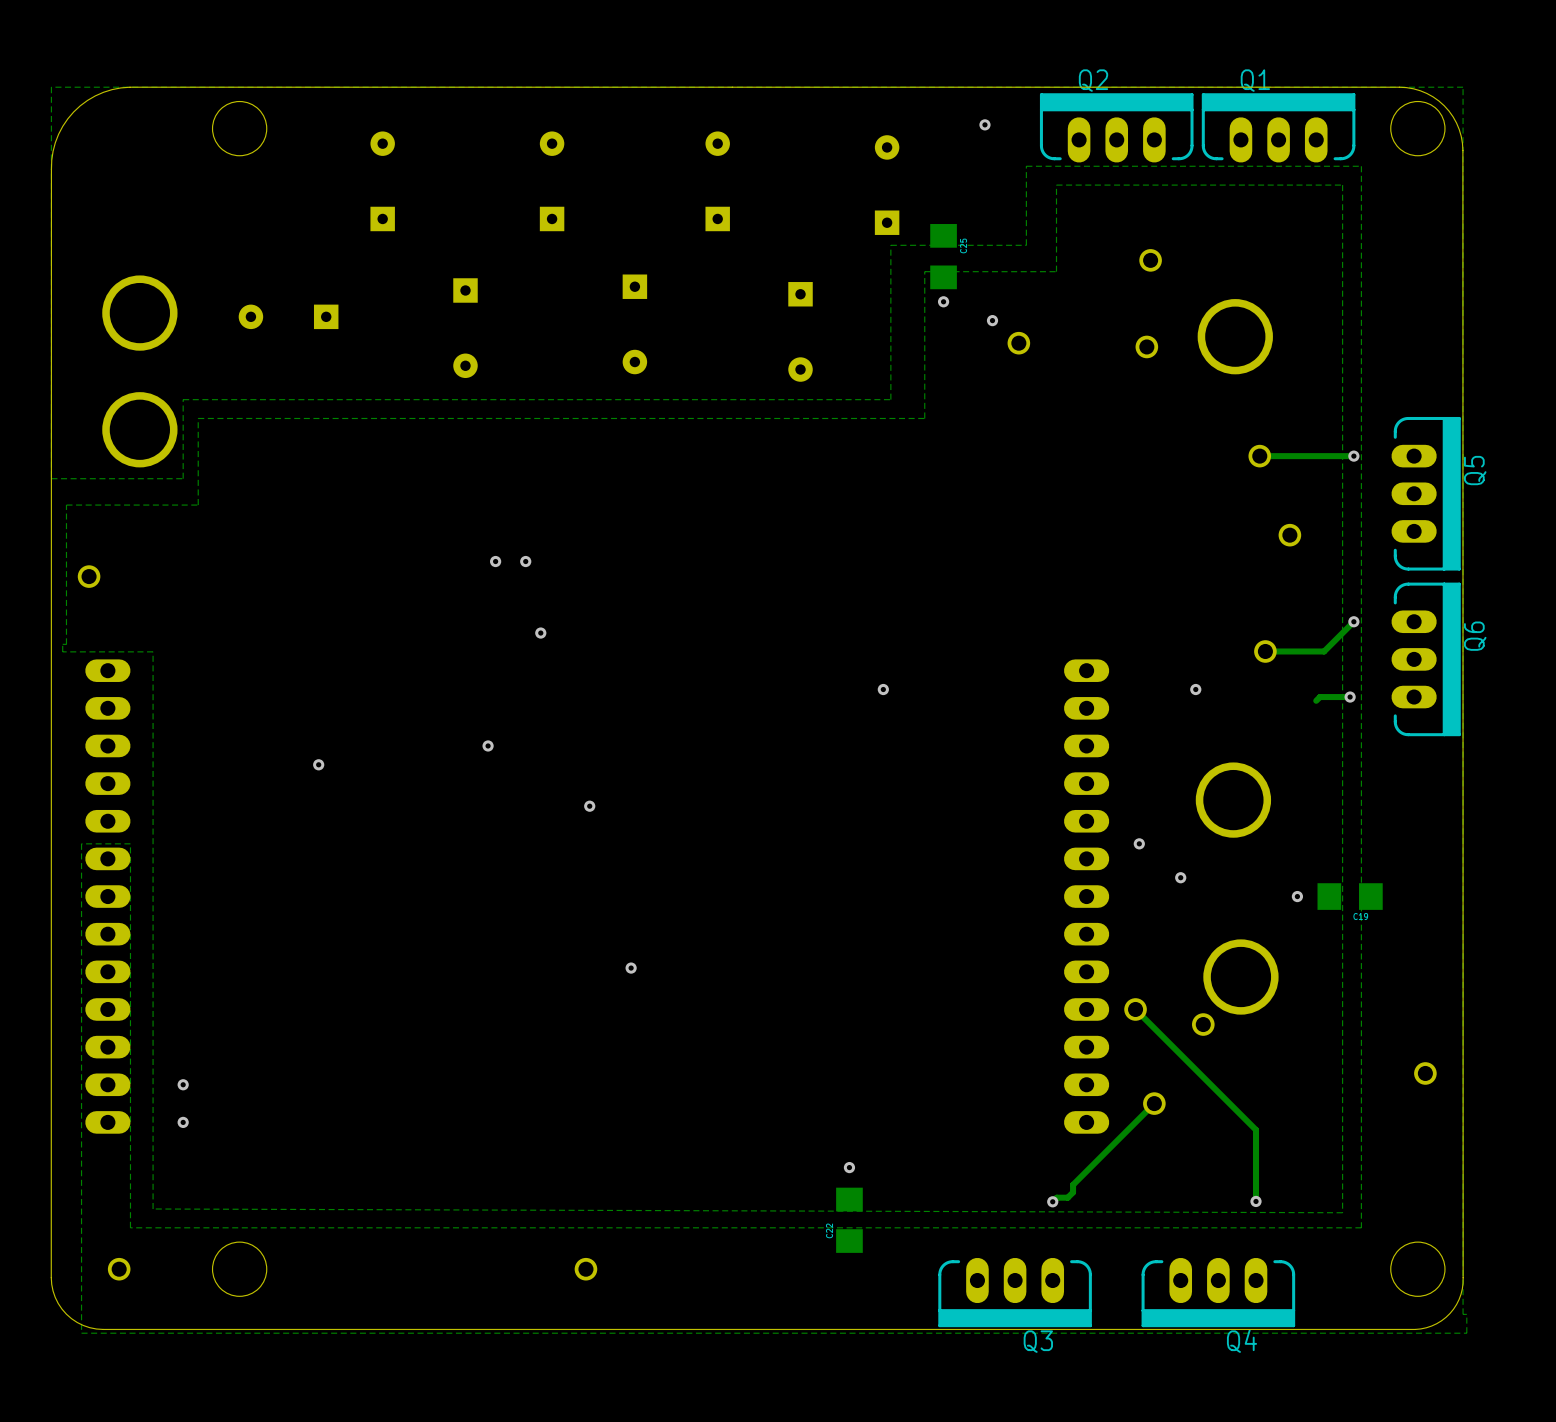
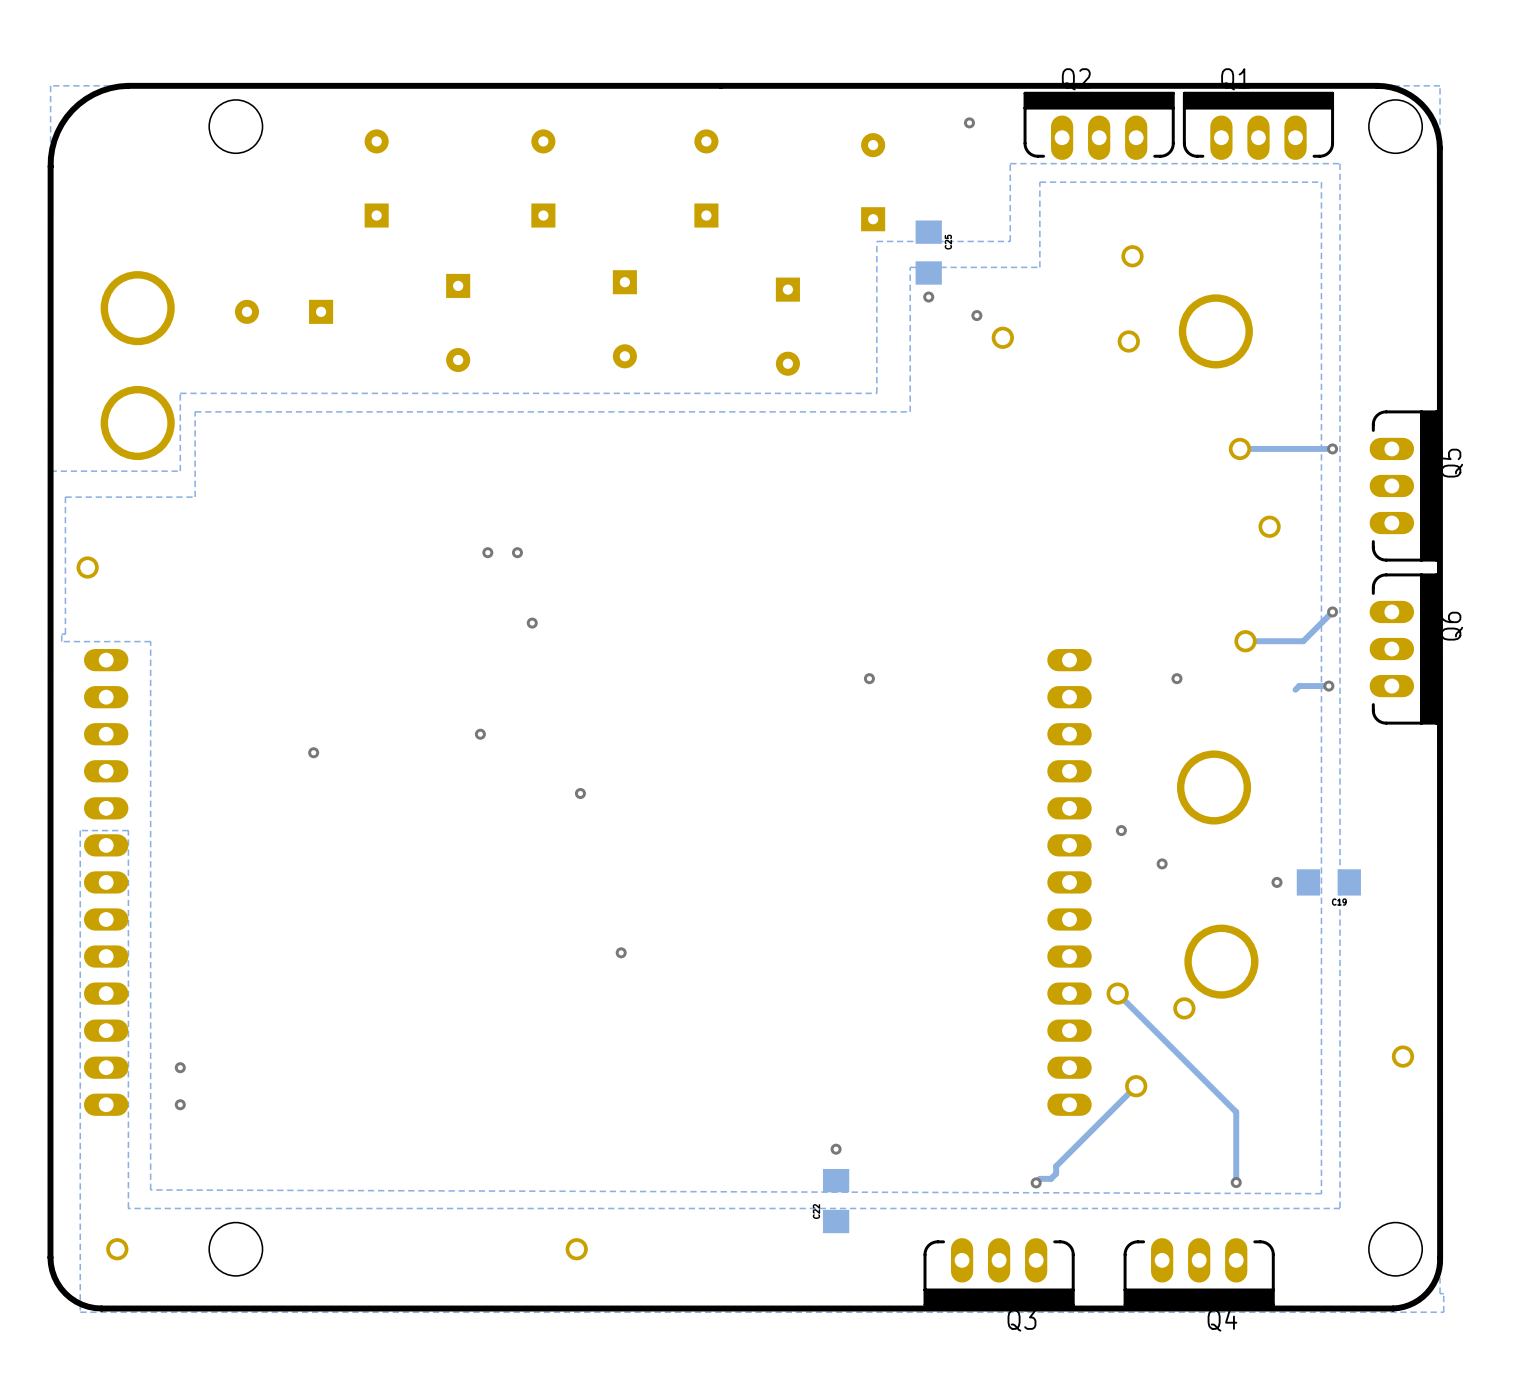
board edge width: thin (1399, 87) (129, 87) (103, 92) (80, 105) (67, 118) (58, 134) (53, 151) (51, 169) (51, 1277) (55, 1297) (66, 1314) (83, 1325) (103, 1329) (1415, 1329) (1431, 1326) (1445, 1317) (1459, 1299) (1463, 1277) (1462, 150) (1461, 136) (1456, 123) (1444, 105) (1433, 96) (1420, 90) (1399, 87) -> thick (1377, 85) (127, 85) (101, 90) (79, 104) (66, 116) (57, 132) (52, 148) (50, 166) (50, 1257) (54, 1277) (65, 1293) (82, 1304) (101, 1308) (1393, 1308) (1409, 1305) (1423, 1296) (1436, 1279) (1440, 1257) (1439, 148) (1438, 134) (1433, 121) (1421, 104) (1410, 95) (1397, 89) (1377, 85)

